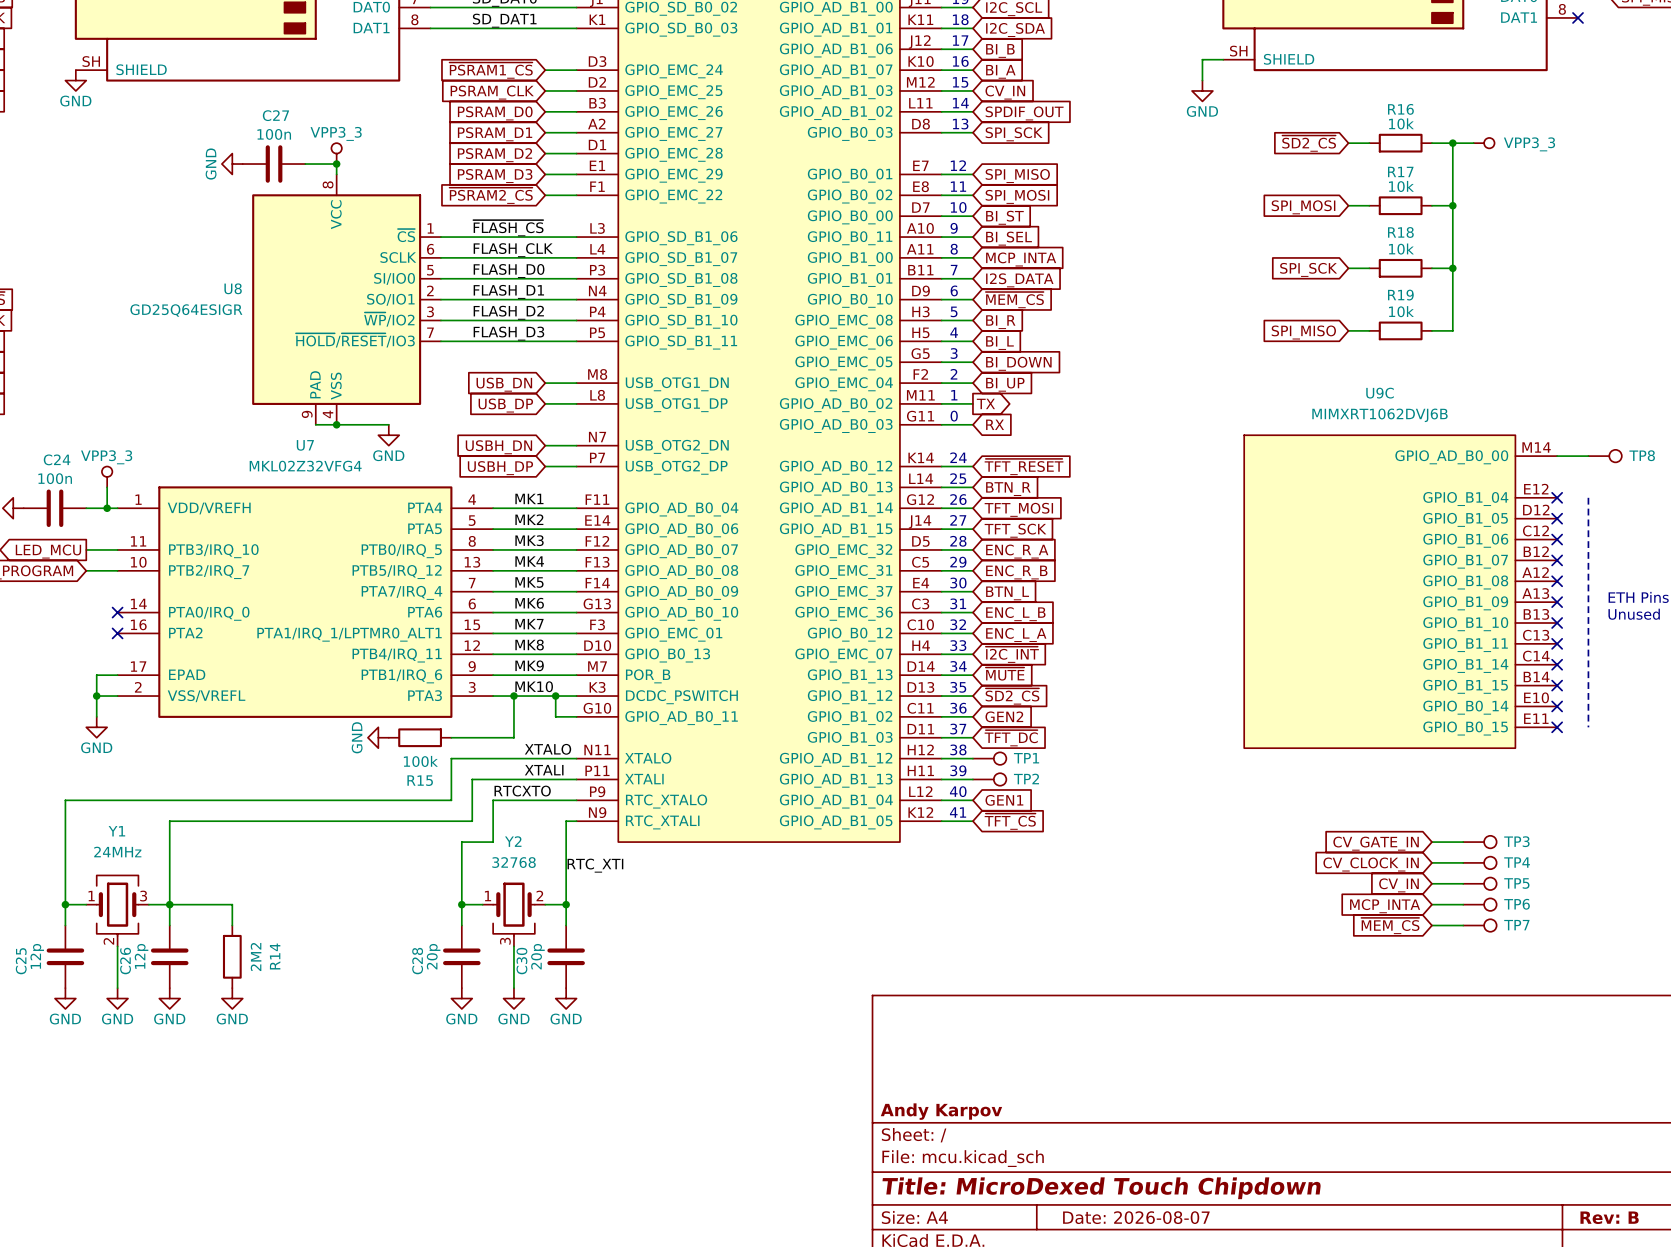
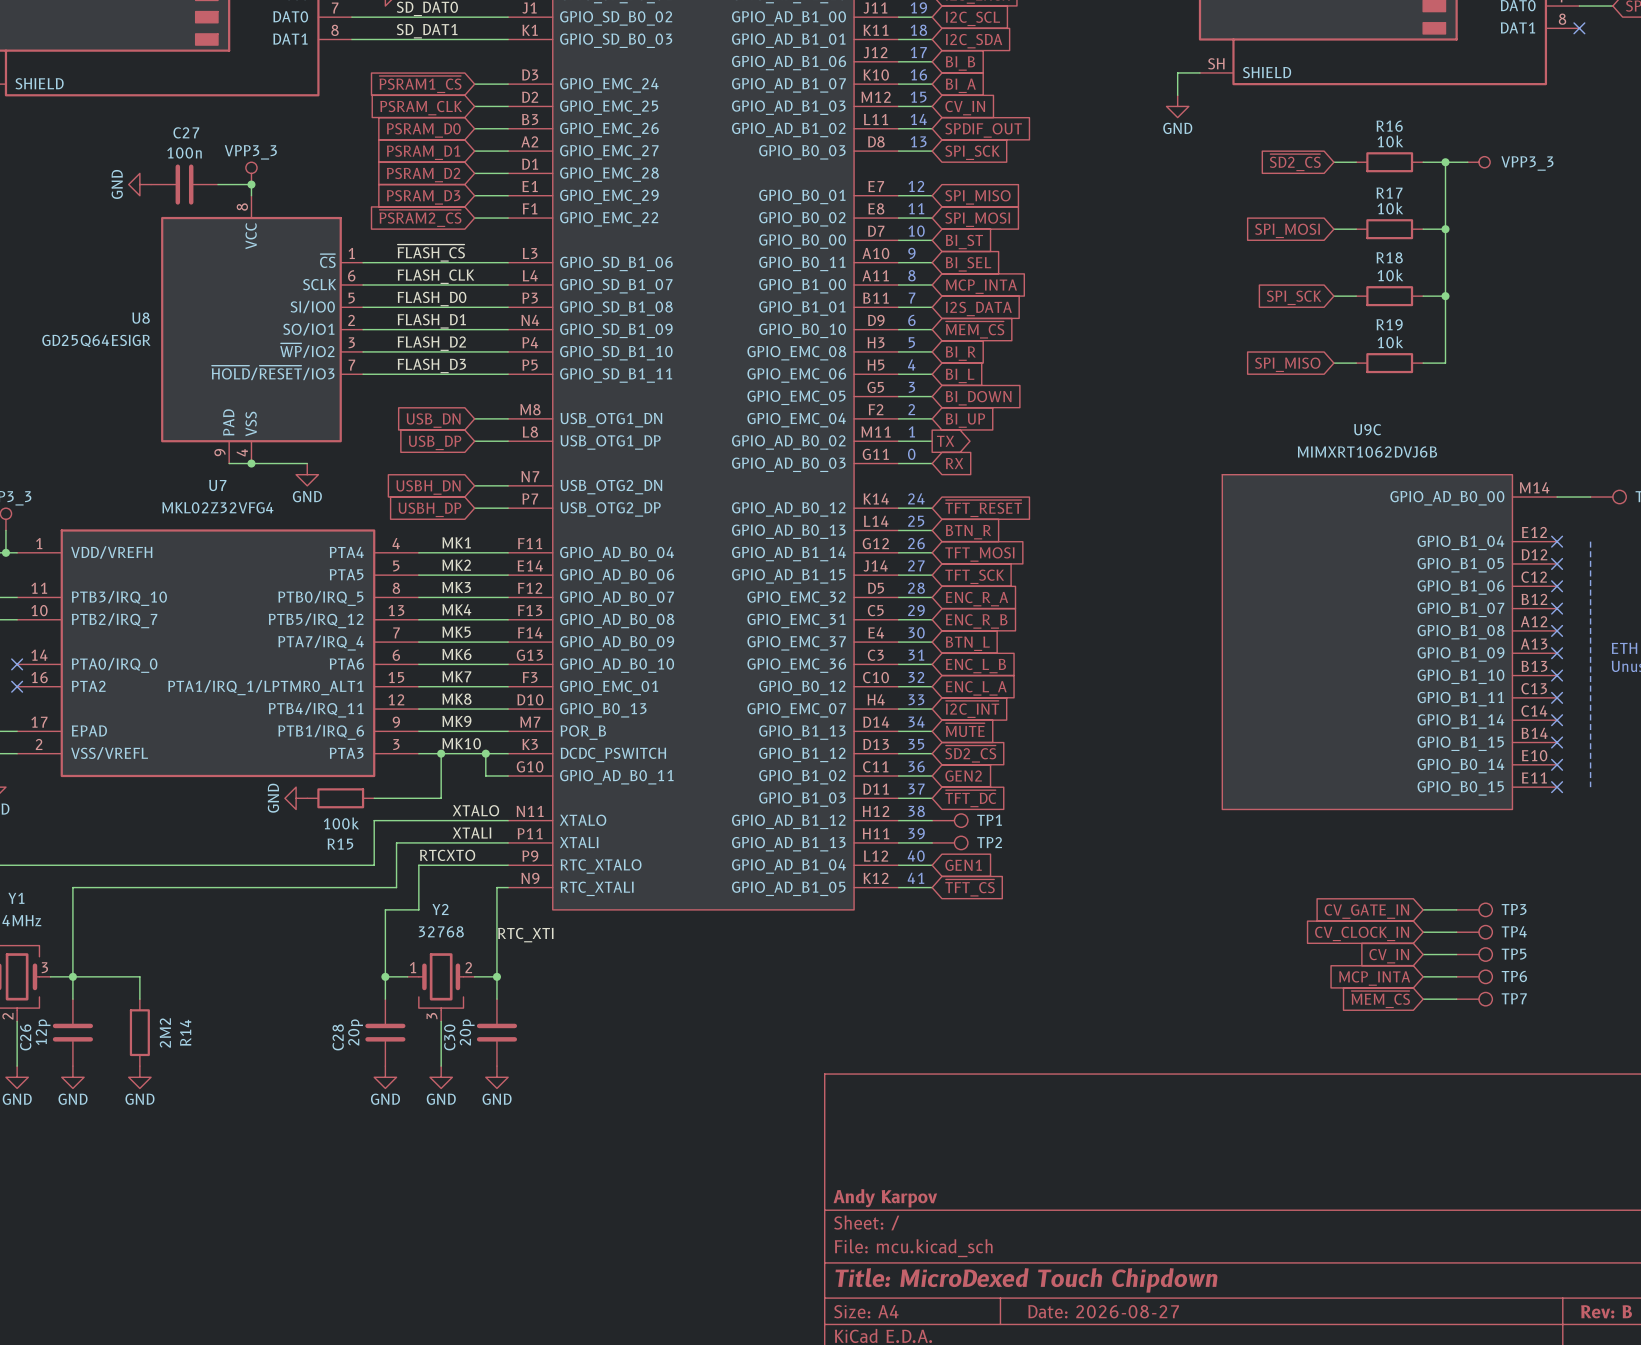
title block: Date: 2026-08-07 (1136, 1217) -> Date: 2026-08-27 (1103, 1311)

